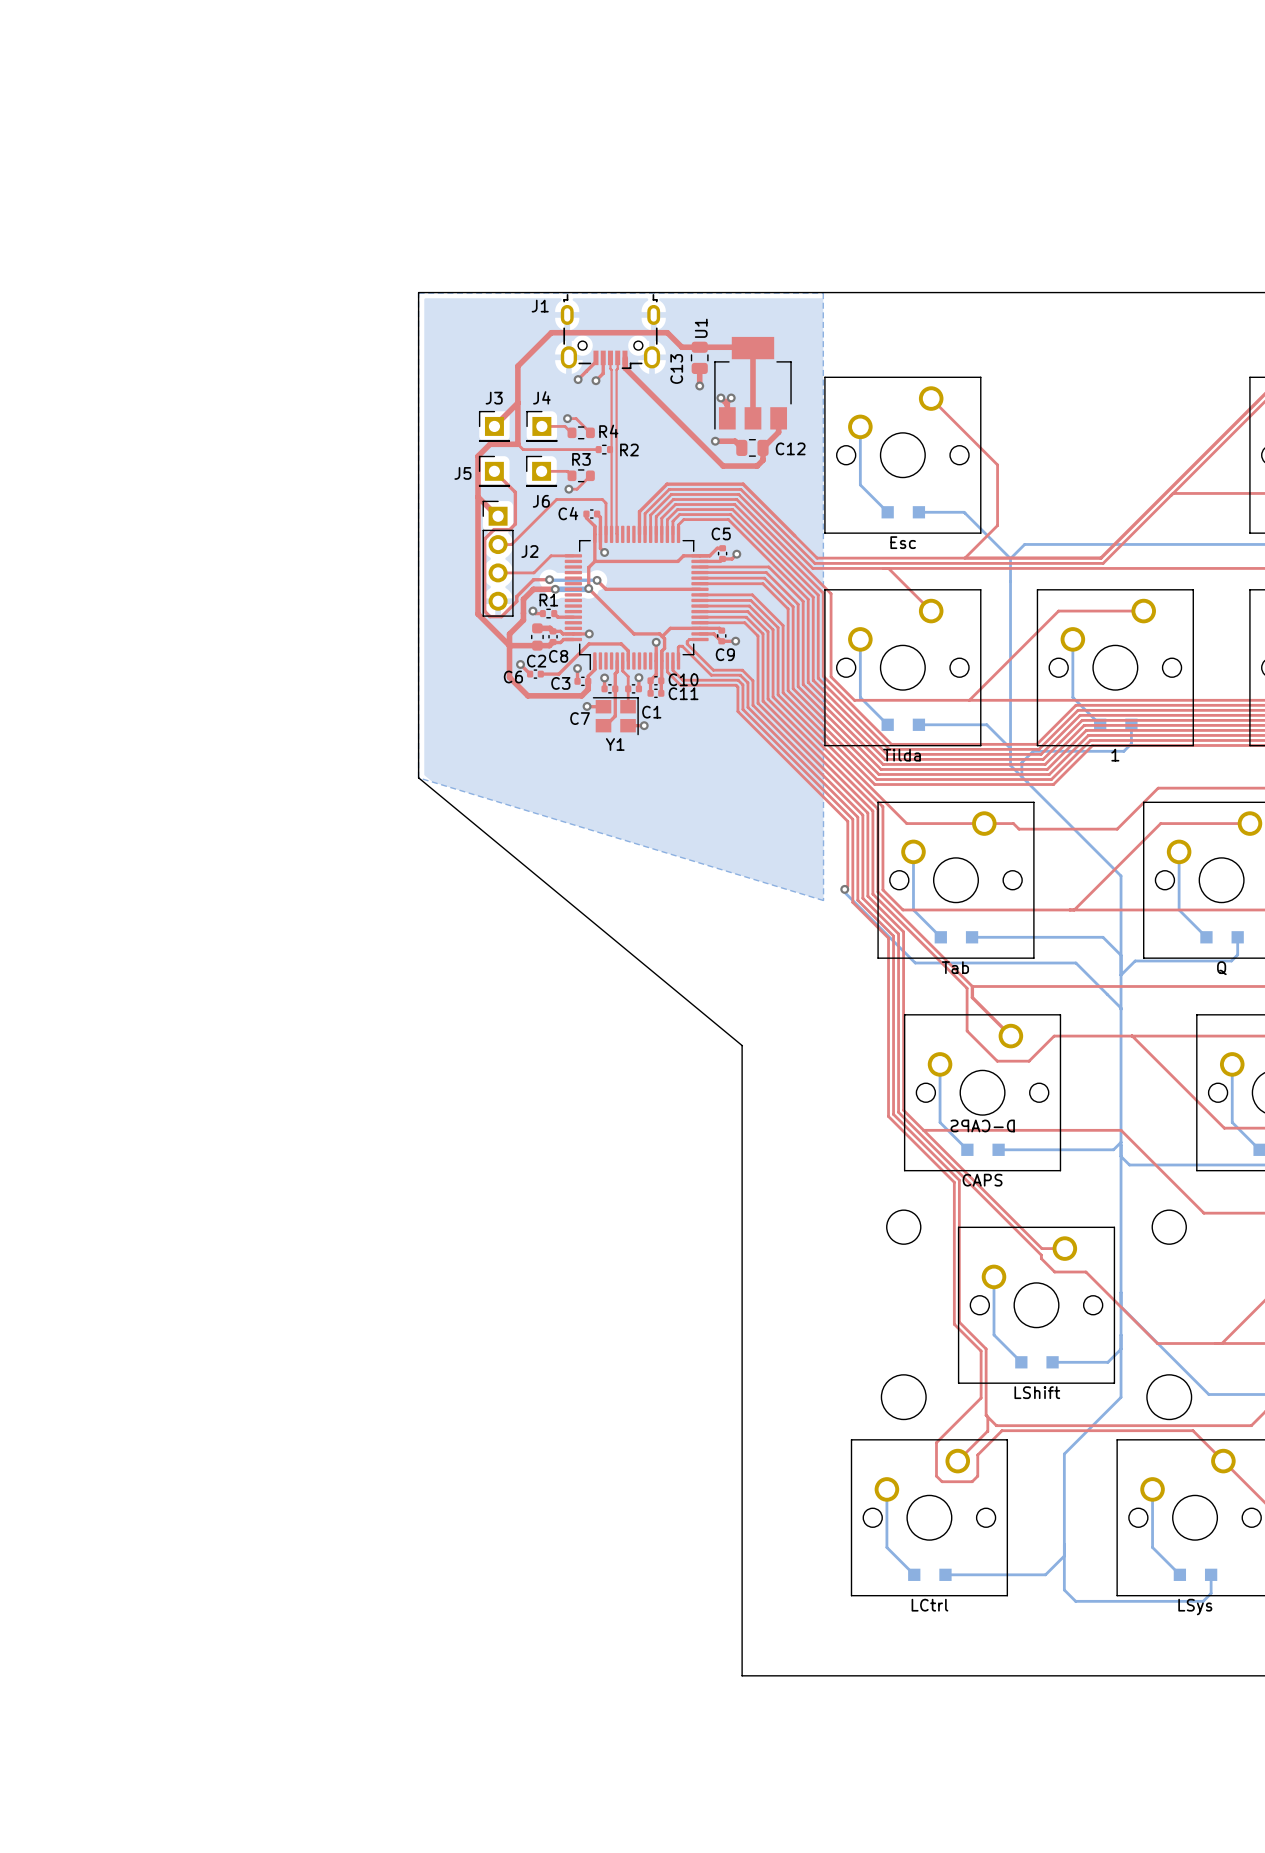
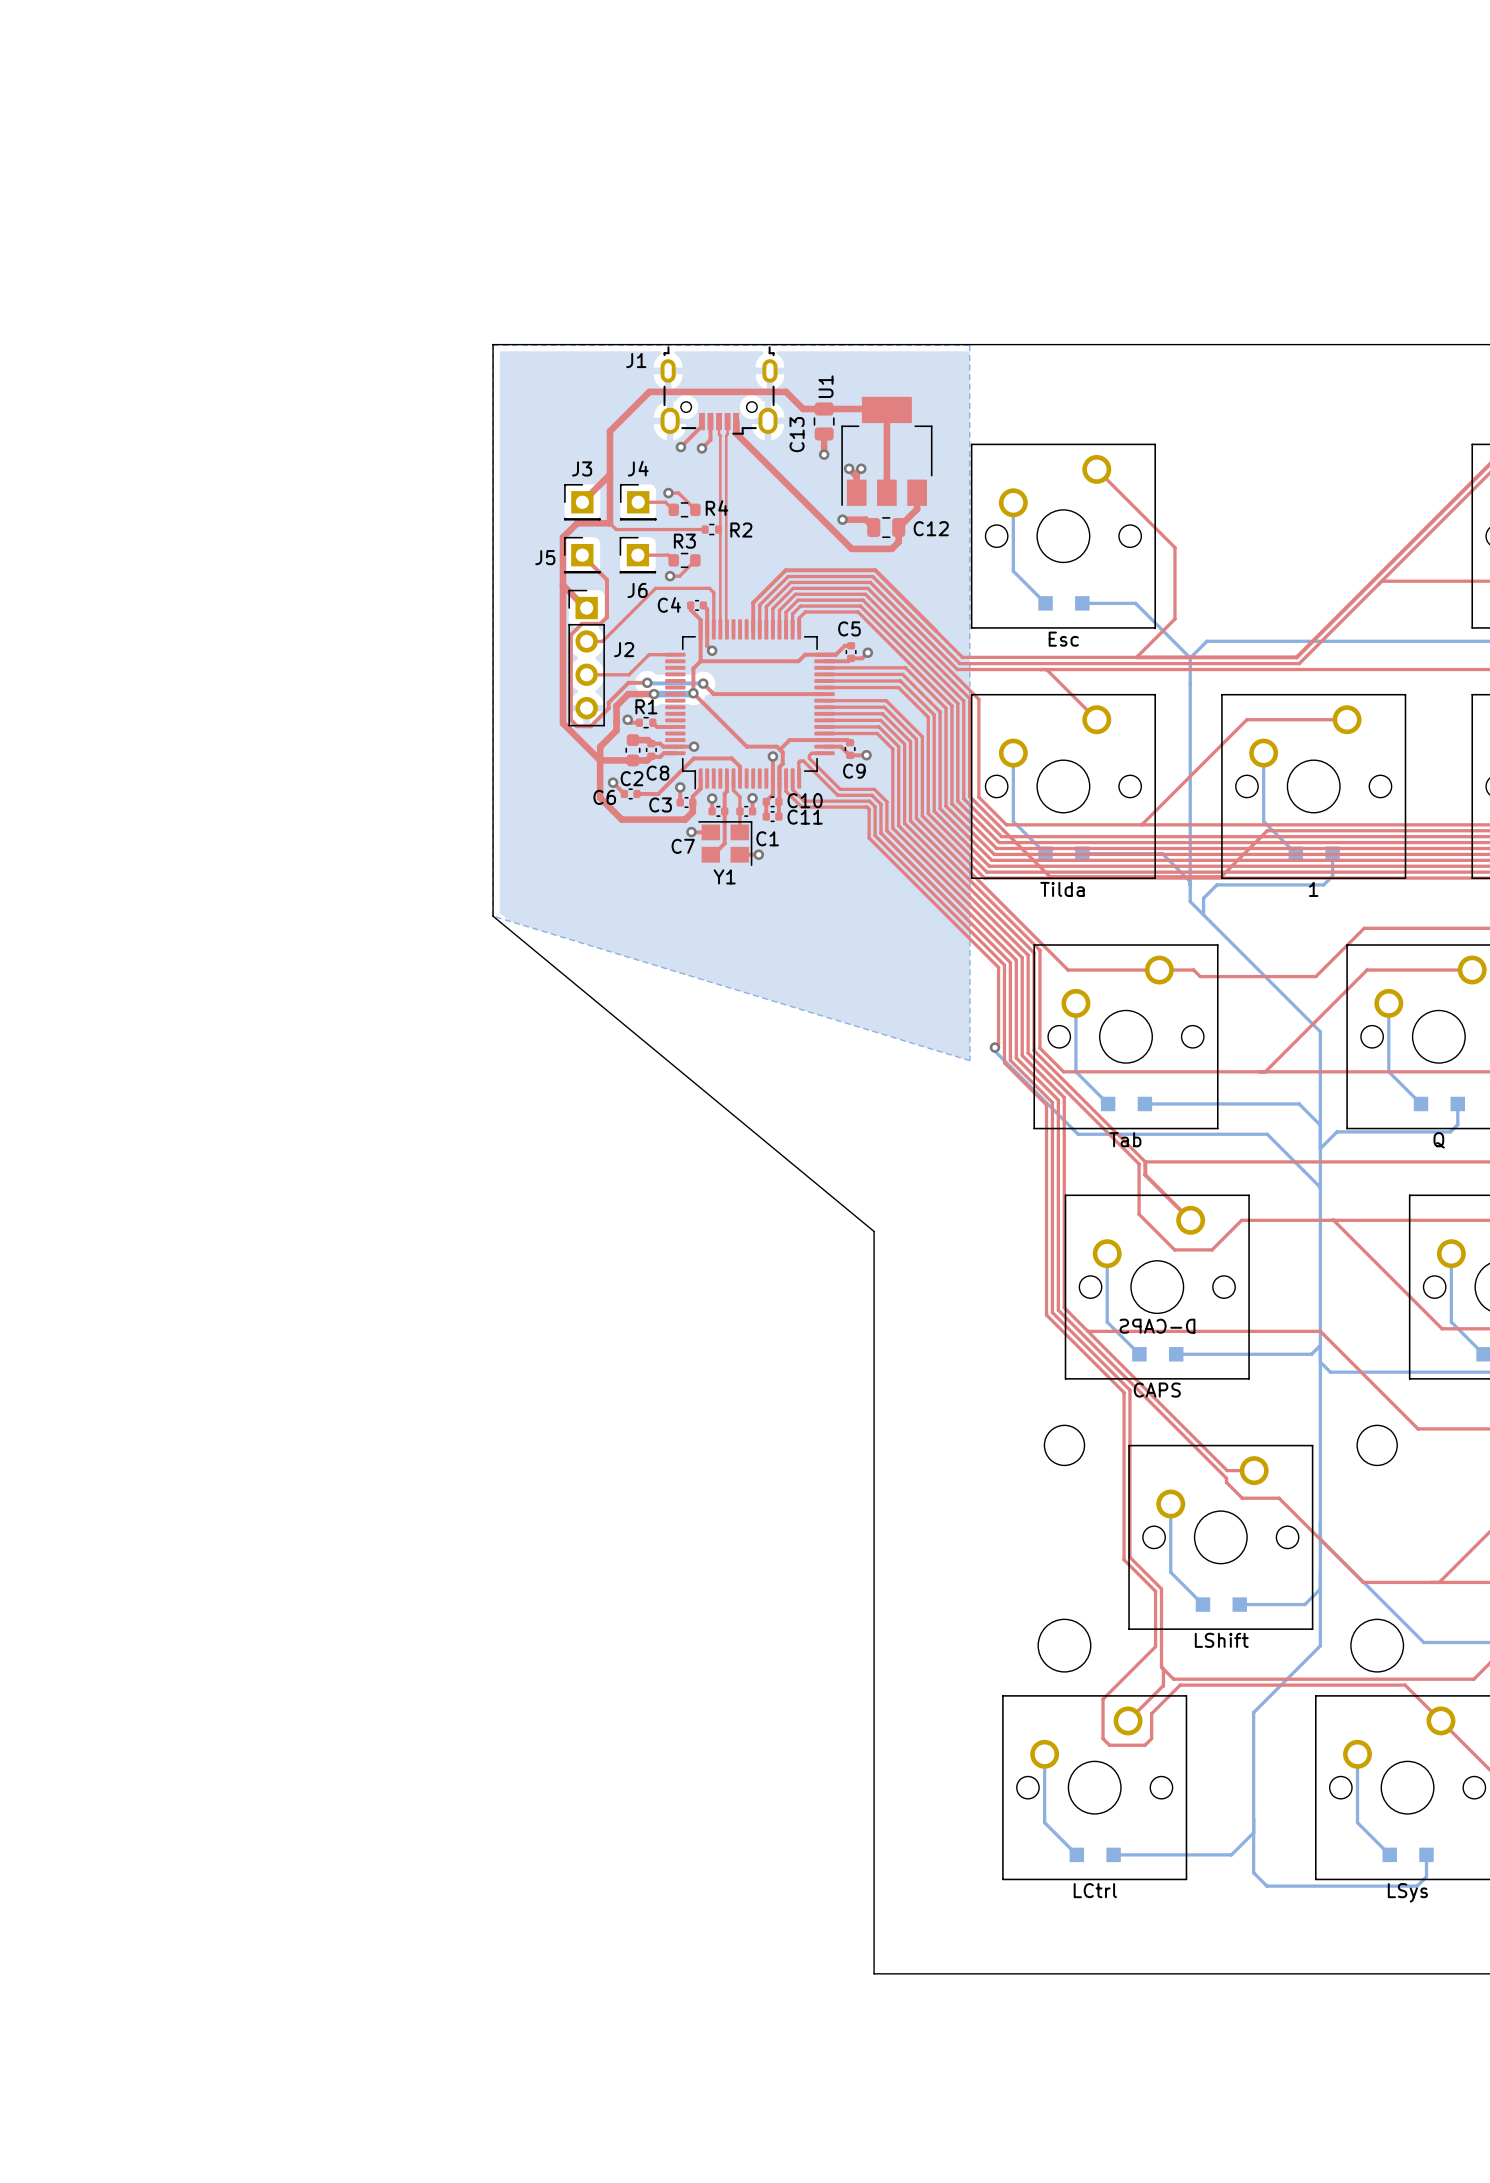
top track: (850, 710) (889, 749) (1038, 749) (1078, 710) -> (1001, 836) (1269, 836)
top track: (848, 715) (887, 754) (1041, 754) (1080, 715) -> (999, 842) (1272, 842)
top track: (846, 720) (885, 759) (1043, 759) (1082, 720) -> (996, 848) (1274, 848)
top track: (844, 725) (883, 764) (1045, 764) (1084, 725) -> (994, 854) (1277, 854)
top track: (842, 730) (881, 769) (1047, 769) (1086, 730) -> (991, 860) (1279, 860)
top track: (839, 735) (878, 774) (1049, 774) (1088, 735) -> (989, 866) (1281, 866)
top track: (837, 740) (876, 779) (1051, 779) (1090, 740) -> (986, 872) (1284, 872)
top track: (835, 745) (874, 784) (1053, 784) (1092, 745) -> (984, 878) (1286, 878)

